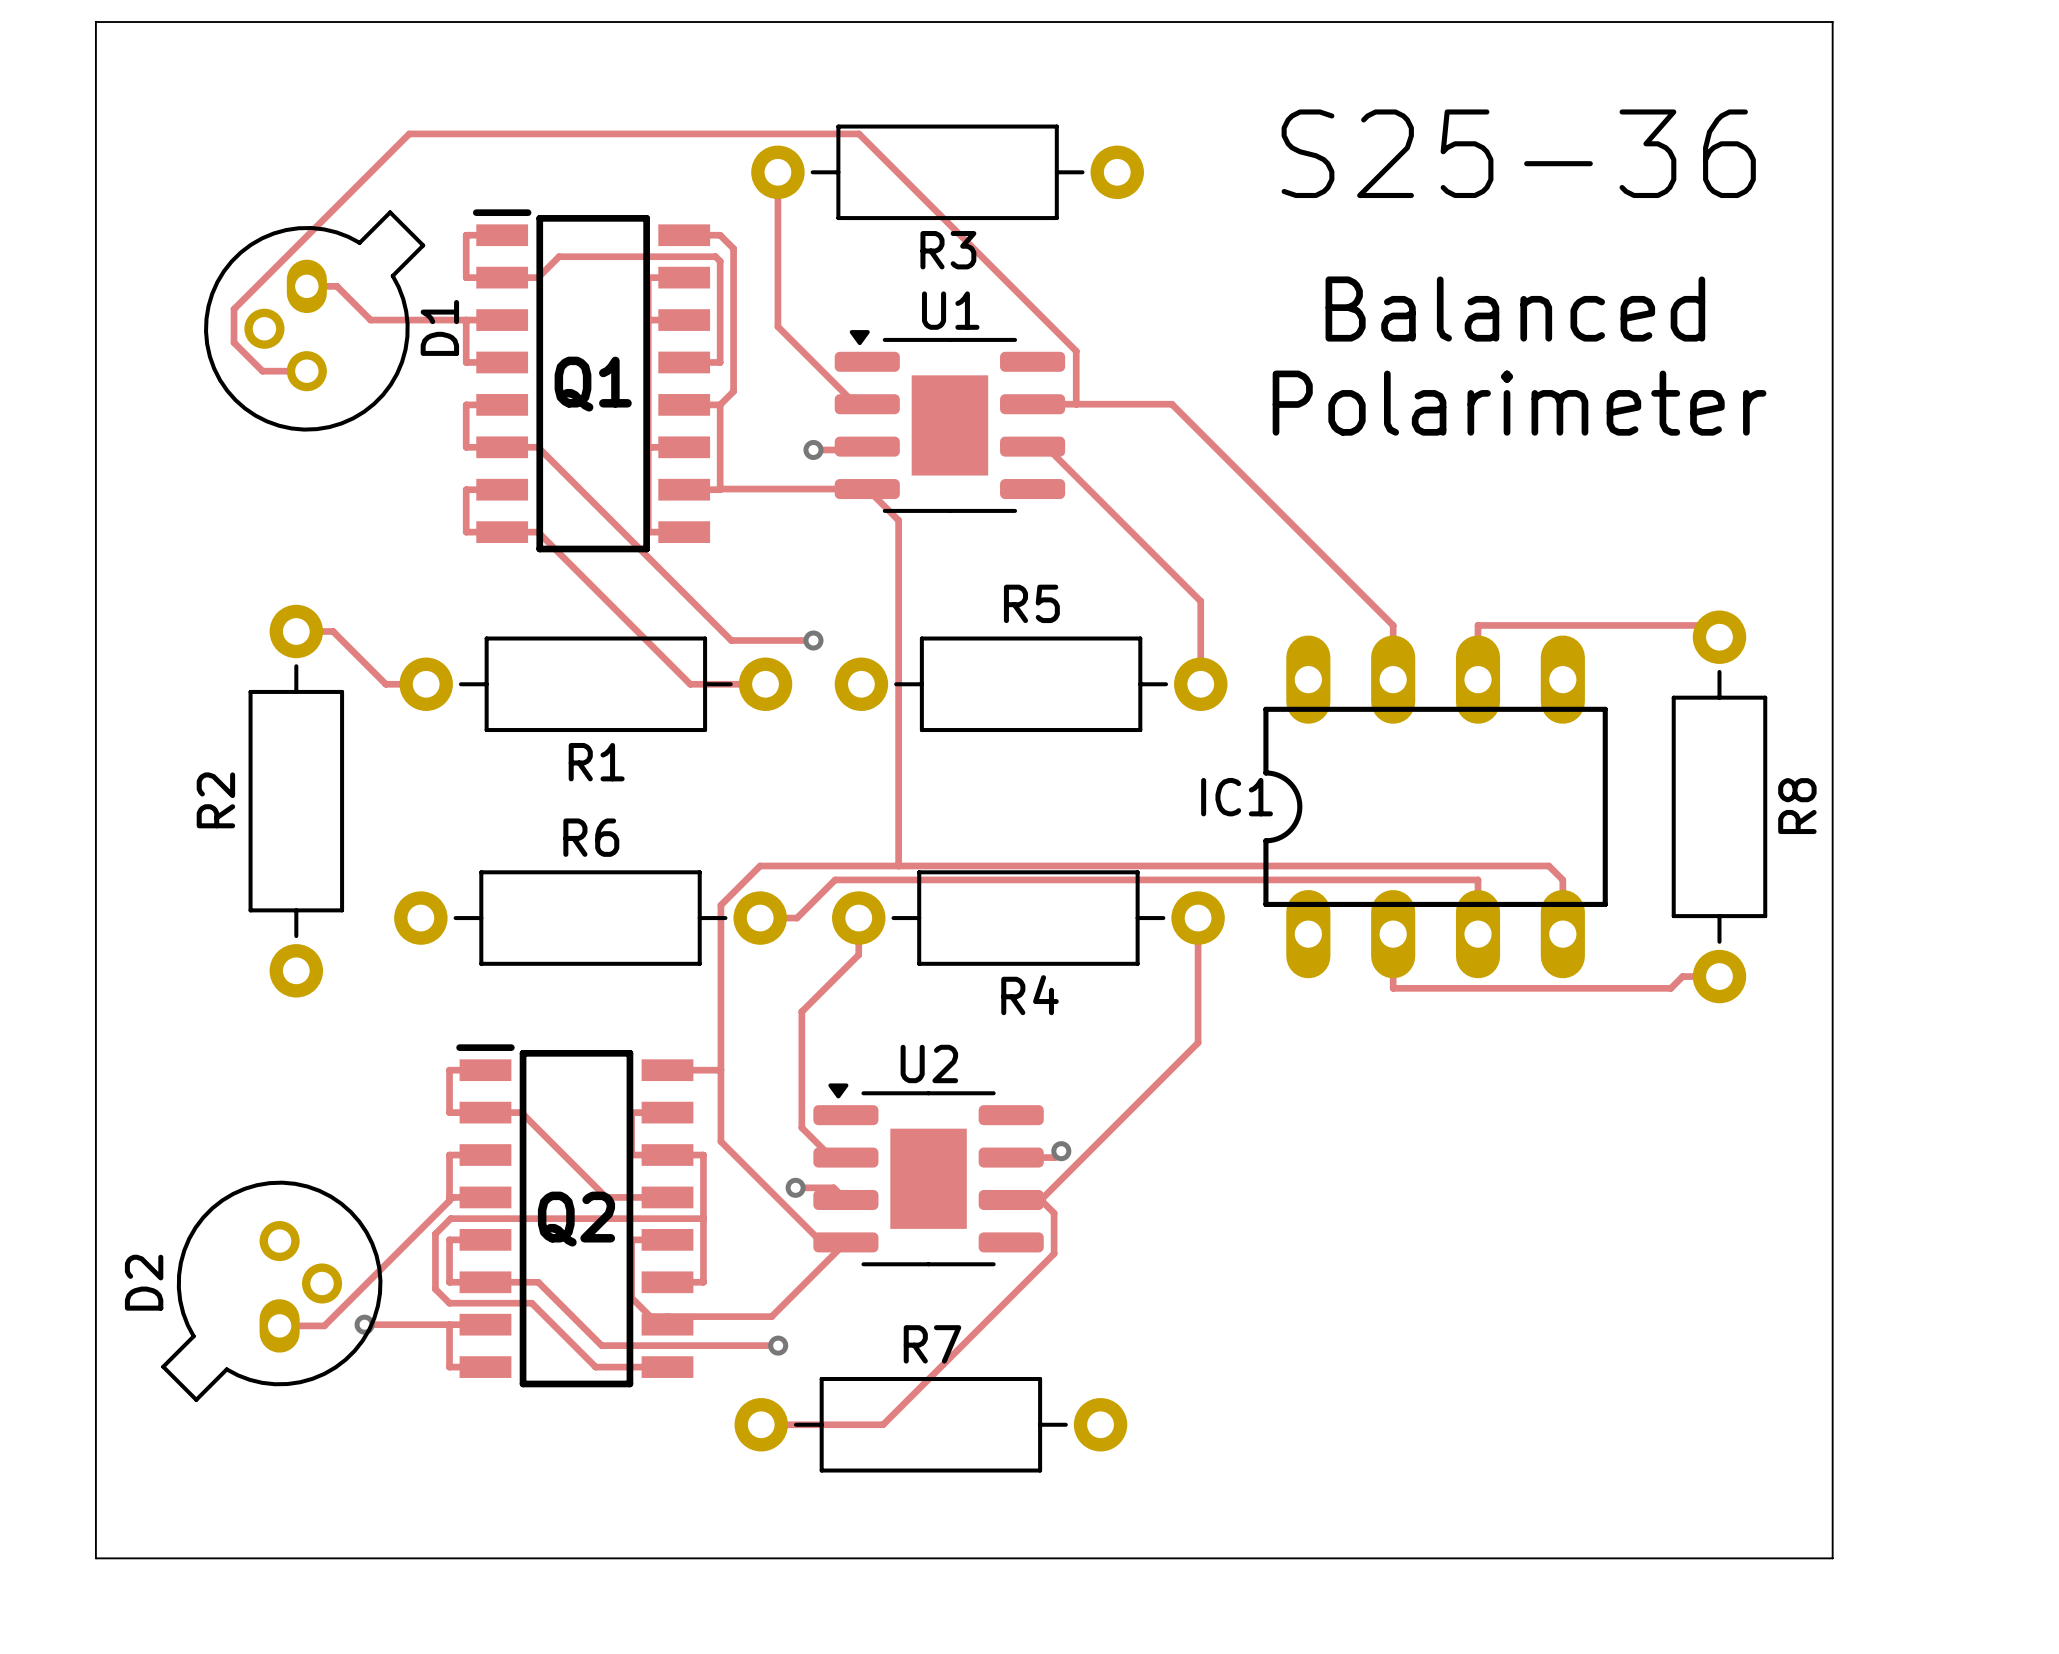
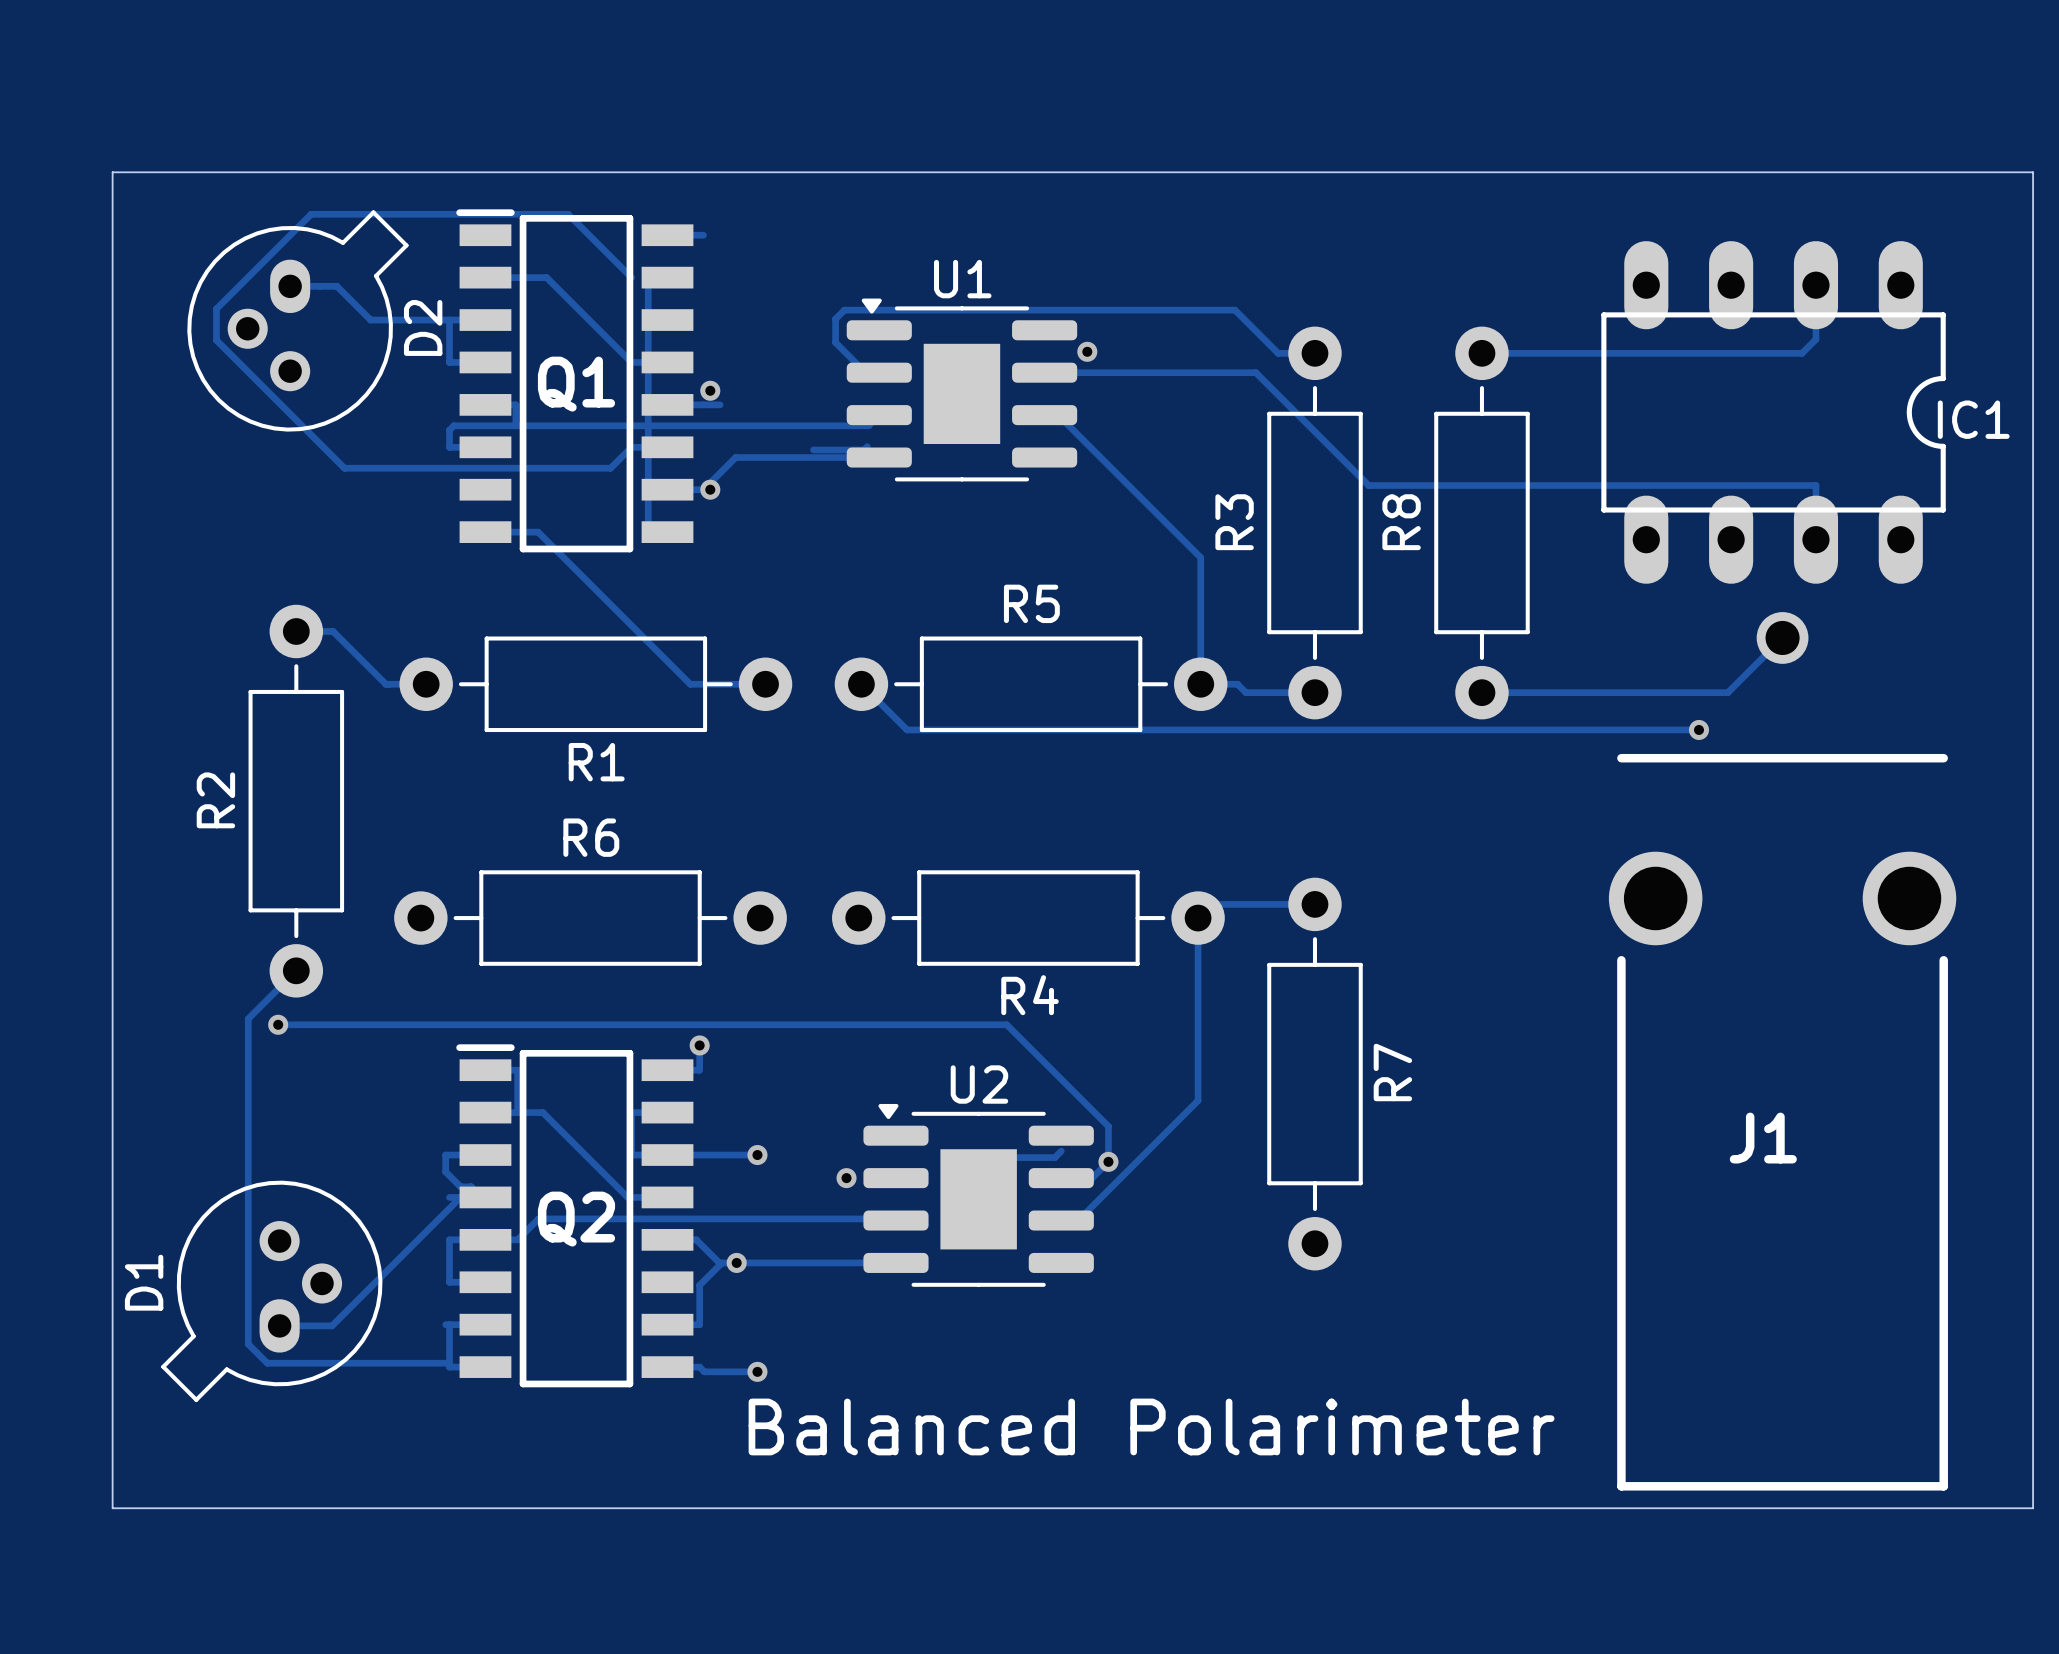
board edge: (95, 22) (1832, 22) (1832, 1558) (95, 1558) (95, 22) -> (112, 172) (112, 1508) (2033, 1508) (2033, 172) (112, 172)
text: S25-36 (1518, 153) -> none
track: (777, 172) (777, 326) (855, 404) (867, 404) -> none
R3 rotation: 0° (947, 172) -> 90° clockwise (1314, 522)
R3 position: (947, 172) -> (1314, 522)
track: (485, 235) (466, 235) (466, 277) (485, 277) -> none
track: (703, 235) (720, 235) (733, 248) (733, 391) (720, 404) (720, 489) (710, 489) -> none
track: (538, 277) (559, 256) (715, 256) (720, 261) (720, 362) (684, 362) -> (538, 277) (546, 277) (631, 362) (667, 362)
track: none -> (631, 277) (568, 214) (311, 214) (216, 308) (216, 340) (344, 468) (610, 468) (631, 447) (648, 447)
track: none -> (1815, 285) (1815, 339) (1802, 353) (1481, 353)
text: Balanced (1515, 309) -> none
D1 position: (314, 320) -> (297, 320)
track: (466, 320) (466, 362) -> (449, 320) (449, 362) (466, 362)
D1 name: D1 (439, 327) -> D2 (423, 327)
via: none -> (1087, 351)
track: none -> (1314, 353) (1278, 353) (1235, 310) (844, 310) (835, 319) (835, 342) (865, 372) (879, 372)
track: (306, 371) (262, 371) (234, 342) (234, 309) (409, 133) (858, 133) (1076, 351) (1076, 404) -> none
track: none -> (1044, 372) (1255, 372) (1368, 485) (1815, 485) (1815, 539)
Q1 position: (591, 380) -> (574, 380)
via: none -> (710, 390)
text: Polarimeter (1519, 403) -> none
track: (485, 404) (466, 404) (466, 447) -> (879, 415) (868, 425) (453, 425) (449, 430) (449, 447) (466, 447)
track: none -> (502, 404) (515, 404) (515, 425)
track: (1032, 404) (1171, 404) (1393, 625) (1393, 679) -> none
U1 position: (949, 421) -> (961, 389)
track: (1032, 446) (1046, 446) (1200, 601) -> (1044, 415) (1058, 415) (1200, 557) (1200, 601)
track: (485, 447) (538, 447) (731, 640) (813, 640) -> none
via: (813, 449) -> none
track: none -> (879, 457) (735, 457) (703, 489)
track: (485, 489) (466, 489) (466, 532) (485, 532) -> none
via: none -> (710, 489)
track: (720, 489) (867, 489) (898, 520) (898, 865) -> none
track: (1719, 637) (1707, 625) (1478, 625) (1478, 679) -> none
track: none -> (1782, 637) (1727, 692) (1481, 692)
via: (813, 640) -> none
track: none -> (861, 684) (907, 729) (1699, 729)
track: none -> (1200, 684) (1237, 684) (1245, 692) (1314, 692)
via: none -> (1699, 729)
IC1 rotation: 0° (1435, 806) -> 180° (1773, 412)
IC1 position: (1435, 806) -> (1773, 412)
R8 position: (1719, 806) -> (1481, 522)
R8 name position: R8 (1797, 806) -> R8 (1401, 522)
track: none -> (1314, 904) (1211, 904) (1198, 918)
track: (760, 918) (796, 918) (835, 879) (1478, 879) (1478, 934) -> none
track: (858, 918) (858, 954) (801, 1011) (801, 1127) (831, 1157) (845, 1157) -> none
track: (1393, 934) (1393, 988) (1670, 988) (1682, 976) (1719, 976) -> none
track: (1562, 934) (1562, 879) (1548, 865) (760, 865) (720, 905) (720, 1141) (821, 1242) (845, 1242) (771, 1316) (650, 1316) (631, 1297) (631, 1239) (663, 1239) -> none
track: none -> (296, 970) (248, 1018) (248, 1344) (267, 1363) (445, 1363)
track: none -> (278, 1024) (1006, 1024) (1108, 1126) (1108, 1161) (1092, 1178) (1061, 1178)
via: none -> (278, 1024)
track: (1198, 1042) (1040, 1199) -> (1198, 1042) (1198, 1100) (1078, 1220) (1061, 1220)
via: none -> (699, 1045)
J1: none -> (1782, 1051)
track: (481, 1070) (449, 1070) (449, 1112) (481, 1112) -> none
track: none -> (485, 1070) (517, 1070) (517, 1112)
track: (699, 1070) (720, 1070) -> (699, 1070) (699, 1045)
track: (521, 1112) (606, 1197) (627, 1197) -> (521, 1112) (542, 1112) (627, 1197)
via position: (1061, 1151) -> (1108, 1161)
track: (449, 1155) (449, 1200) (324, 1325) -> (471, 1186) (332, 1325) (324, 1325)
track: none -> (449, 1155) (445, 1155) (445, 1171) (460, 1186) (471, 1186)
track: (703, 1155) (703, 1282) (667, 1282) -> (703, 1155) (757, 1155)
via: none -> (757, 1155)
U2 position: (928, 1174) -> (978, 1195)
via: none -> (846, 1178)
track: (795, 1187) (833, 1187) (845, 1199) -> none
via: (795, 1187) -> none
track: (1040, 1199) (1054, 1213) (1054, 1253) (883, 1424) (761, 1424) -> none
track: (703, 1218) (450, 1218) (435, 1233) (435, 1289) (449, 1303) (531, 1303) (595, 1367) (663, 1367) -> none
track: none -> (895, 1220) (894, 1218) (538, 1218) (517, 1239) (485, 1239)
track: none -> (667, 1239) (696, 1239) (720, 1264)
via: none -> (736, 1262)
track: none -> (895, 1262) (721, 1262) (699, 1285) (699, 1324) (663, 1324)
D2 name: D2 (144, 1282) -> D1 (144, 1282)
track: (481, 1282) (538, 1282) (601, 1345) (778, 1345) -> none
track: (364, 1324) (445, 1324) -> none
via: (364, 1324) -> none
via position: (778, 1345) -> (757, 1371)
track: none -> (667, 1367) (699, 1367) (704, 1371) (757, 1371)
R7 rotation: 0° (930, 1424) -> 90° clockwise (1314, 1074)
R7 position: (930, 1424) -> (1314, 1074)
text: none -> Balanced Polarimeter (1151, 1426)

